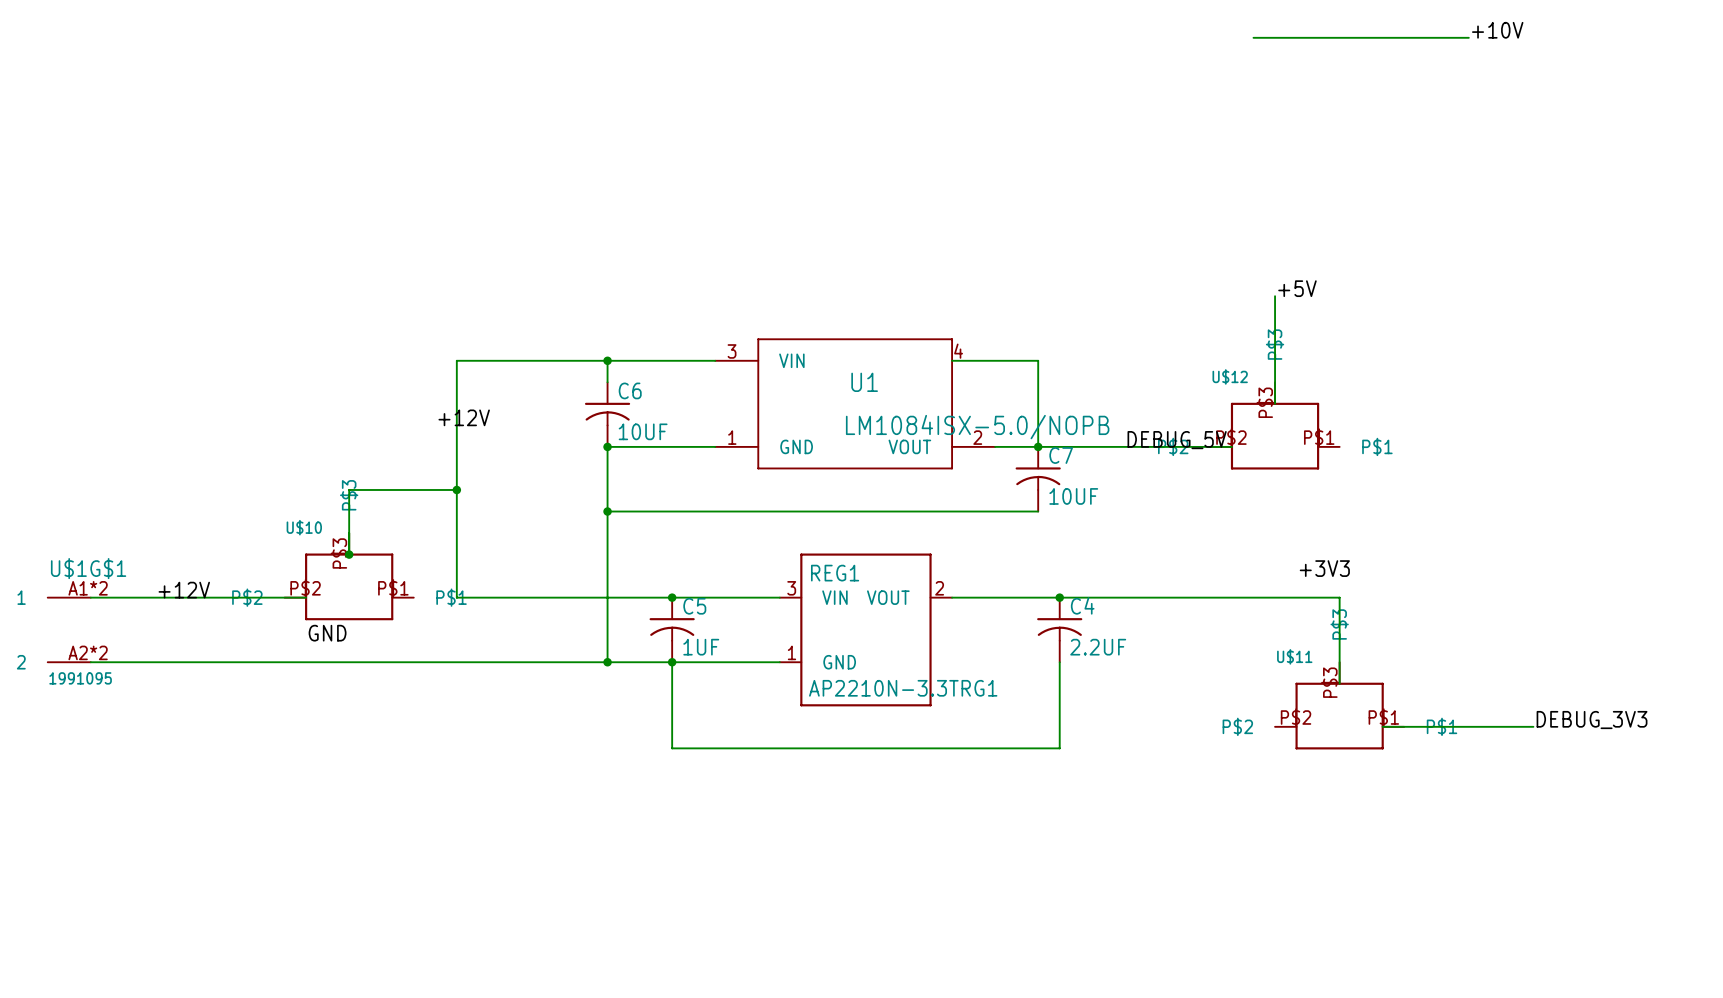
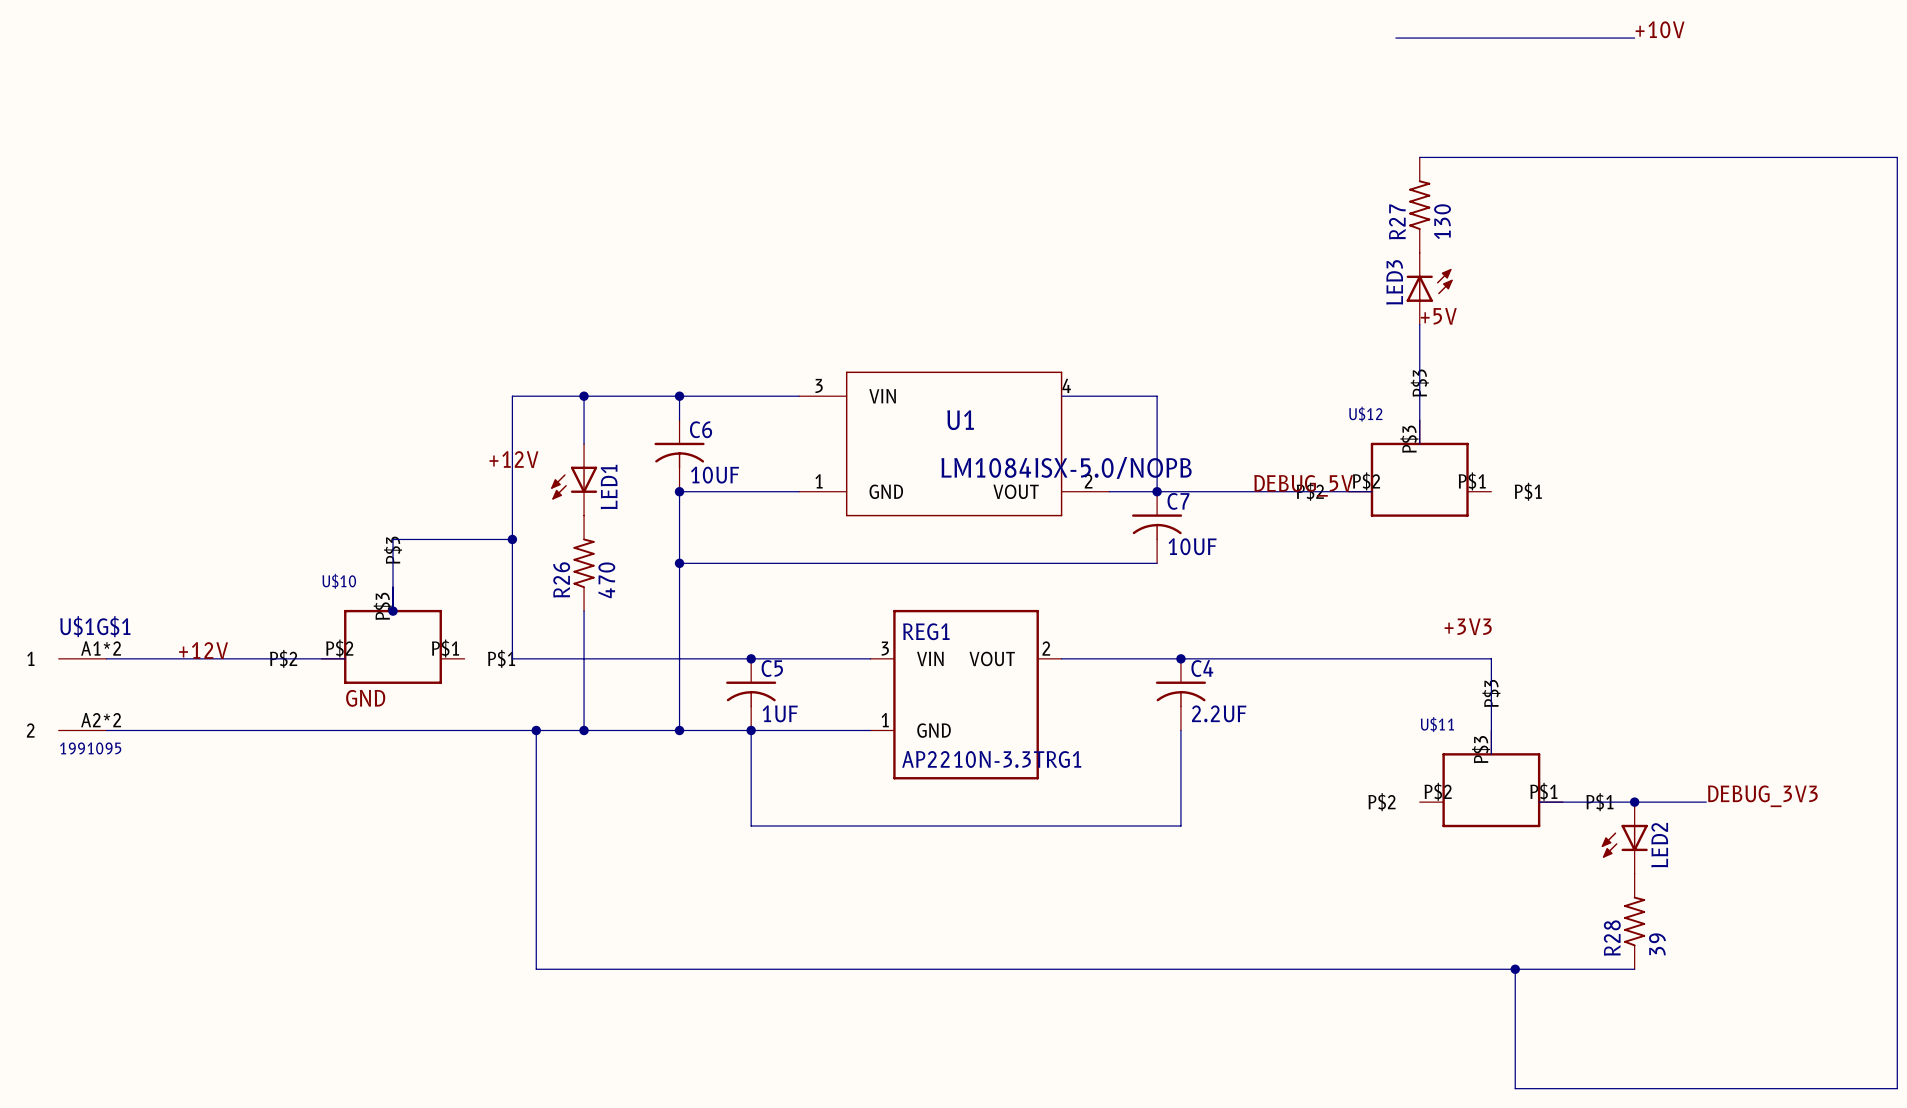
wire: none -> (1419, 157) (1897, 157) (1897, 1088) (1515, 1088) (1515, 969)
R27: none -> 130 (1419, 205)
LED3: none -> (1429, 288)
wire: none -> (584, 396) (584, 443)
junction: none -> (584, 396)
LED1: none -> (574, 479)
R26: none -> 470 (584, 563)
wire: none -> (584, 611) (584, 730)
wire: none -> (536, 730) (536, 969) (1634, 969)
junction: none -> (536, 730)
junction: none -> (584, 730)
junction: none -> (1634, 802)
LED2: none -> (1624, 837)
R28: none -> 39 (1634, 921)
junction: none -> (1515, 969)

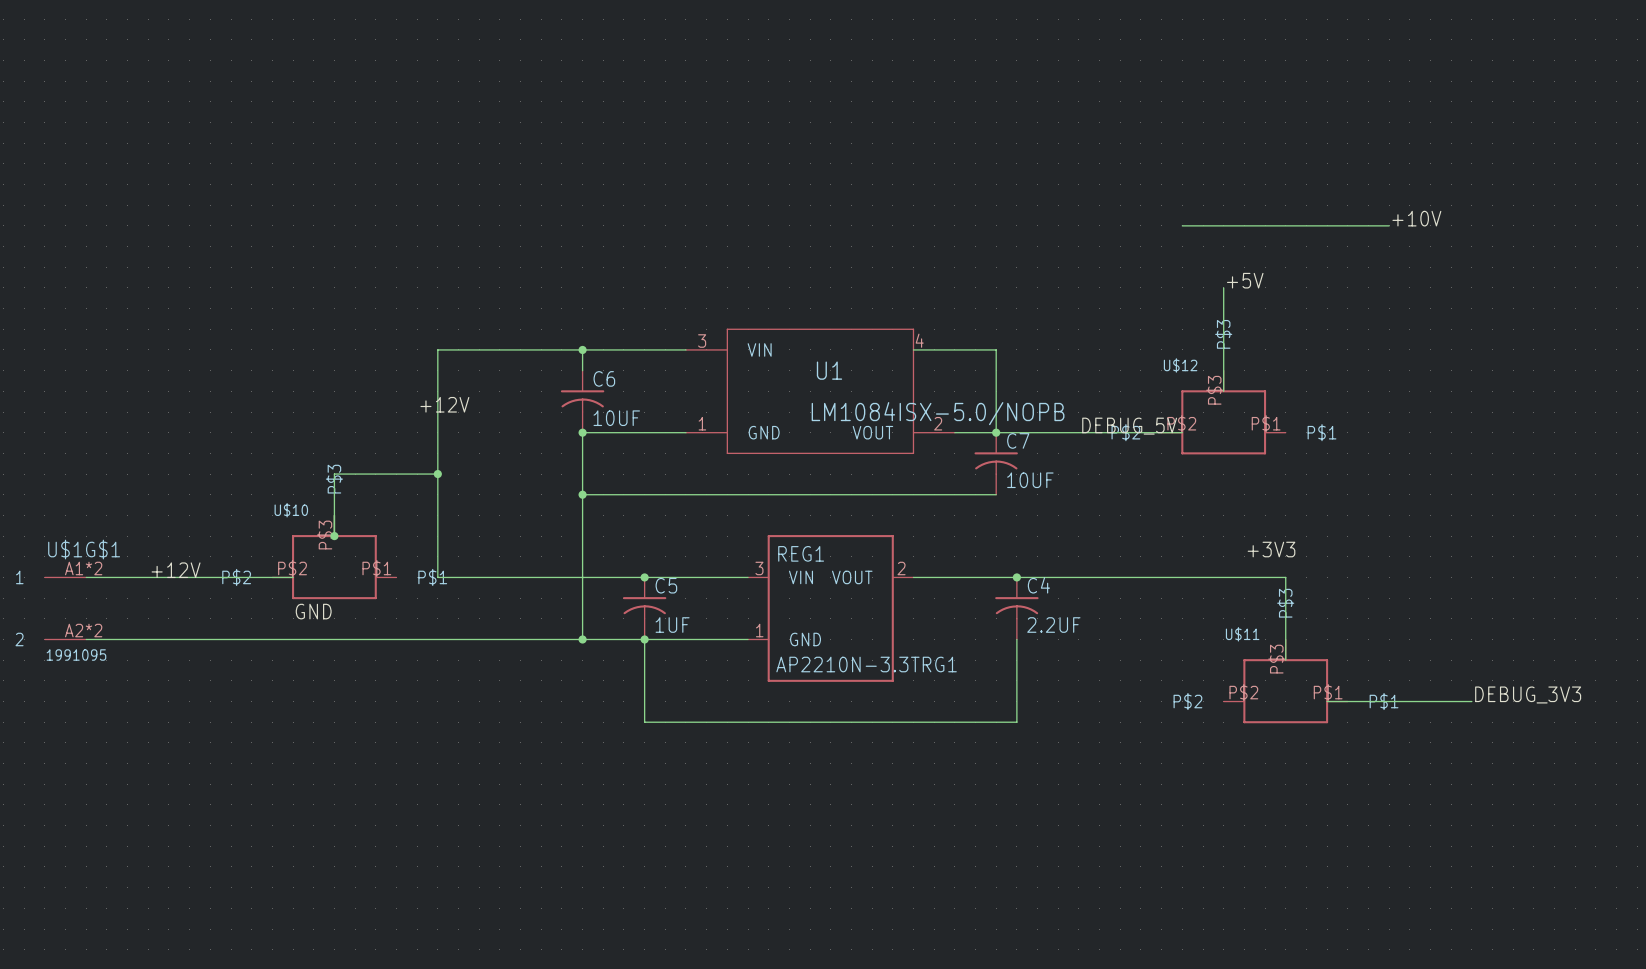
label position: +10V (1660, 29) -> +10V (1416, 218)
wire: (1395, 38) (1634, 38) -> (1182, 225) (1389, 225)
wire: (1419, 157) (1897, 157) (1897, 1088) (1515, 1088) (1515, 969) -> none
R27: 130 (1419, 205) -> none
LED3: (1429, 288) -> none
wire: (584, 396) (584, 443) -> none
junction: (584, 396) -> none
LED1: (574, 479) -> none
R26: 470 (584, 563) -> none
wire: (584, 611) (584, 730) -> none
wire: (536, 730) (536, 969) (1634, 969) -> none
junction: (536, 730) -> none
junction: (584, 730) -> none
junction: (1634, 802) -> none
LED2: (1624, 837) -> none
R28: 39 (1634, 921) -> none
junction: (1515, 969) -> none

